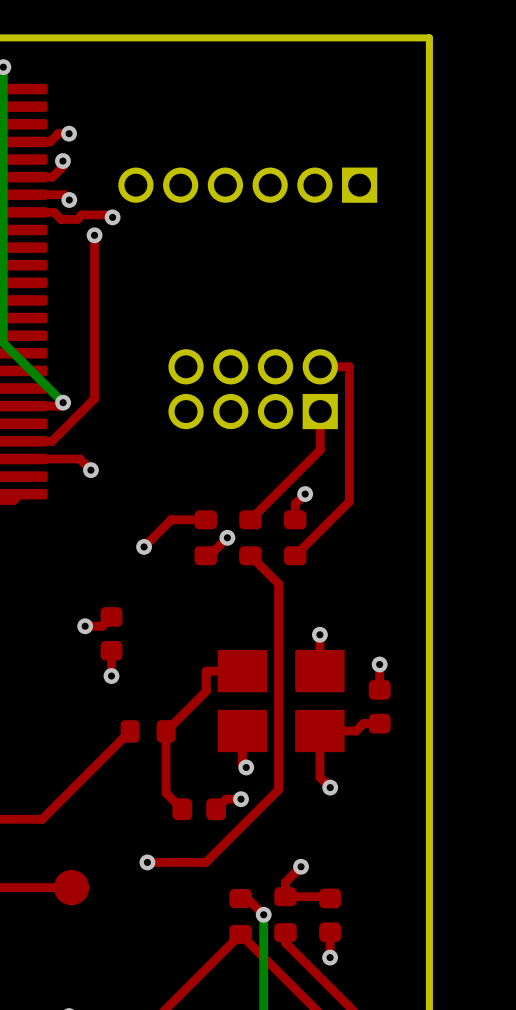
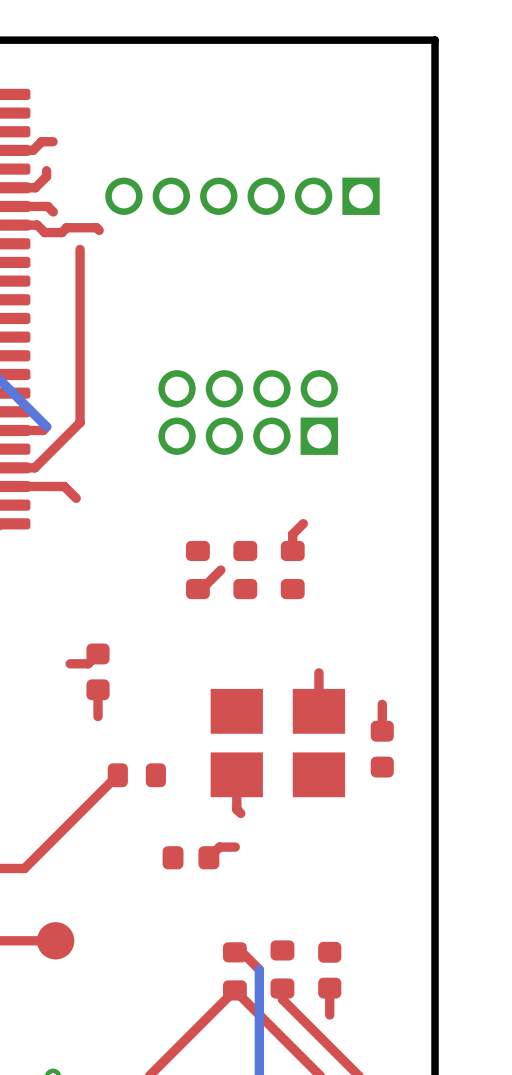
via: (69, 133) -> none
via: (62, 161) -> none
via: (69, 199) -> none
via: (112, 217) -> none
via: (94, 235) -> none
top track: (320, 366) (349, 366) (349, 501) (295, 555) -> none
via: (63, 402) -> none
top track: (320, 411) (320, 450) (250, 519) -> none
via: (90, 470) -> none
via: (305, 494) -> none
top track: (205, 519) (171, 519) (144, 546) -> none
via: (227, 537) -> none
via: (144, 546) -> none
top track: (250, 555) (278, 583) (278, 789) (205, 862) (147, 862) -> none
via: (85, 626) -> none
via: (319, 634) -> none
via: (379, 664) -> none
top track: (242, 671) (206, 671) (206, 691) (166, 731) (166, 793) (182, 809) -> none
via: (111, 676) -> none
top track: (379, 723) (363, 723) (356, 731) (319, 731) (319, 777) (330, 787) -> none
via: (246, 767) -> none
via: (330, 787) -> none
via: (241, 799) -> none
via: (147, 862) -> none
top track: (301, 866) (285, 882) (285, 896) (328, 896) (330, 898) -> none
via: (301, 866) -> none
via: (263, 914) -> none
via: (330, 957) -> none

